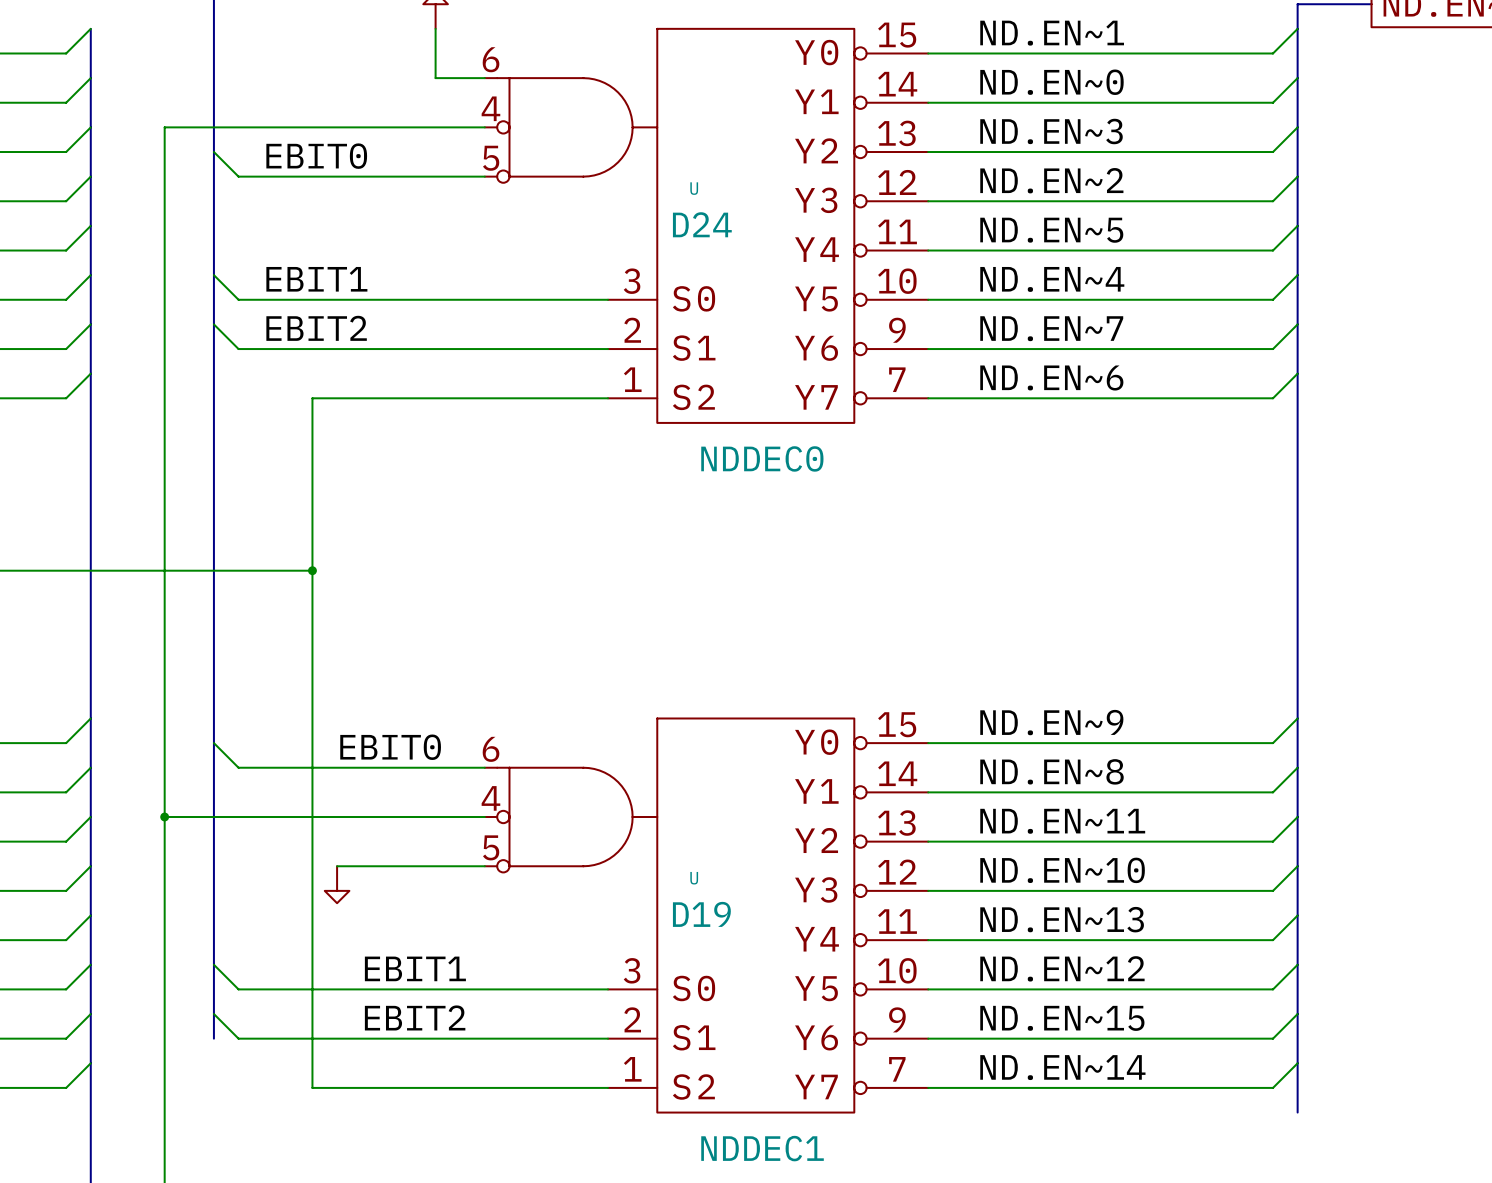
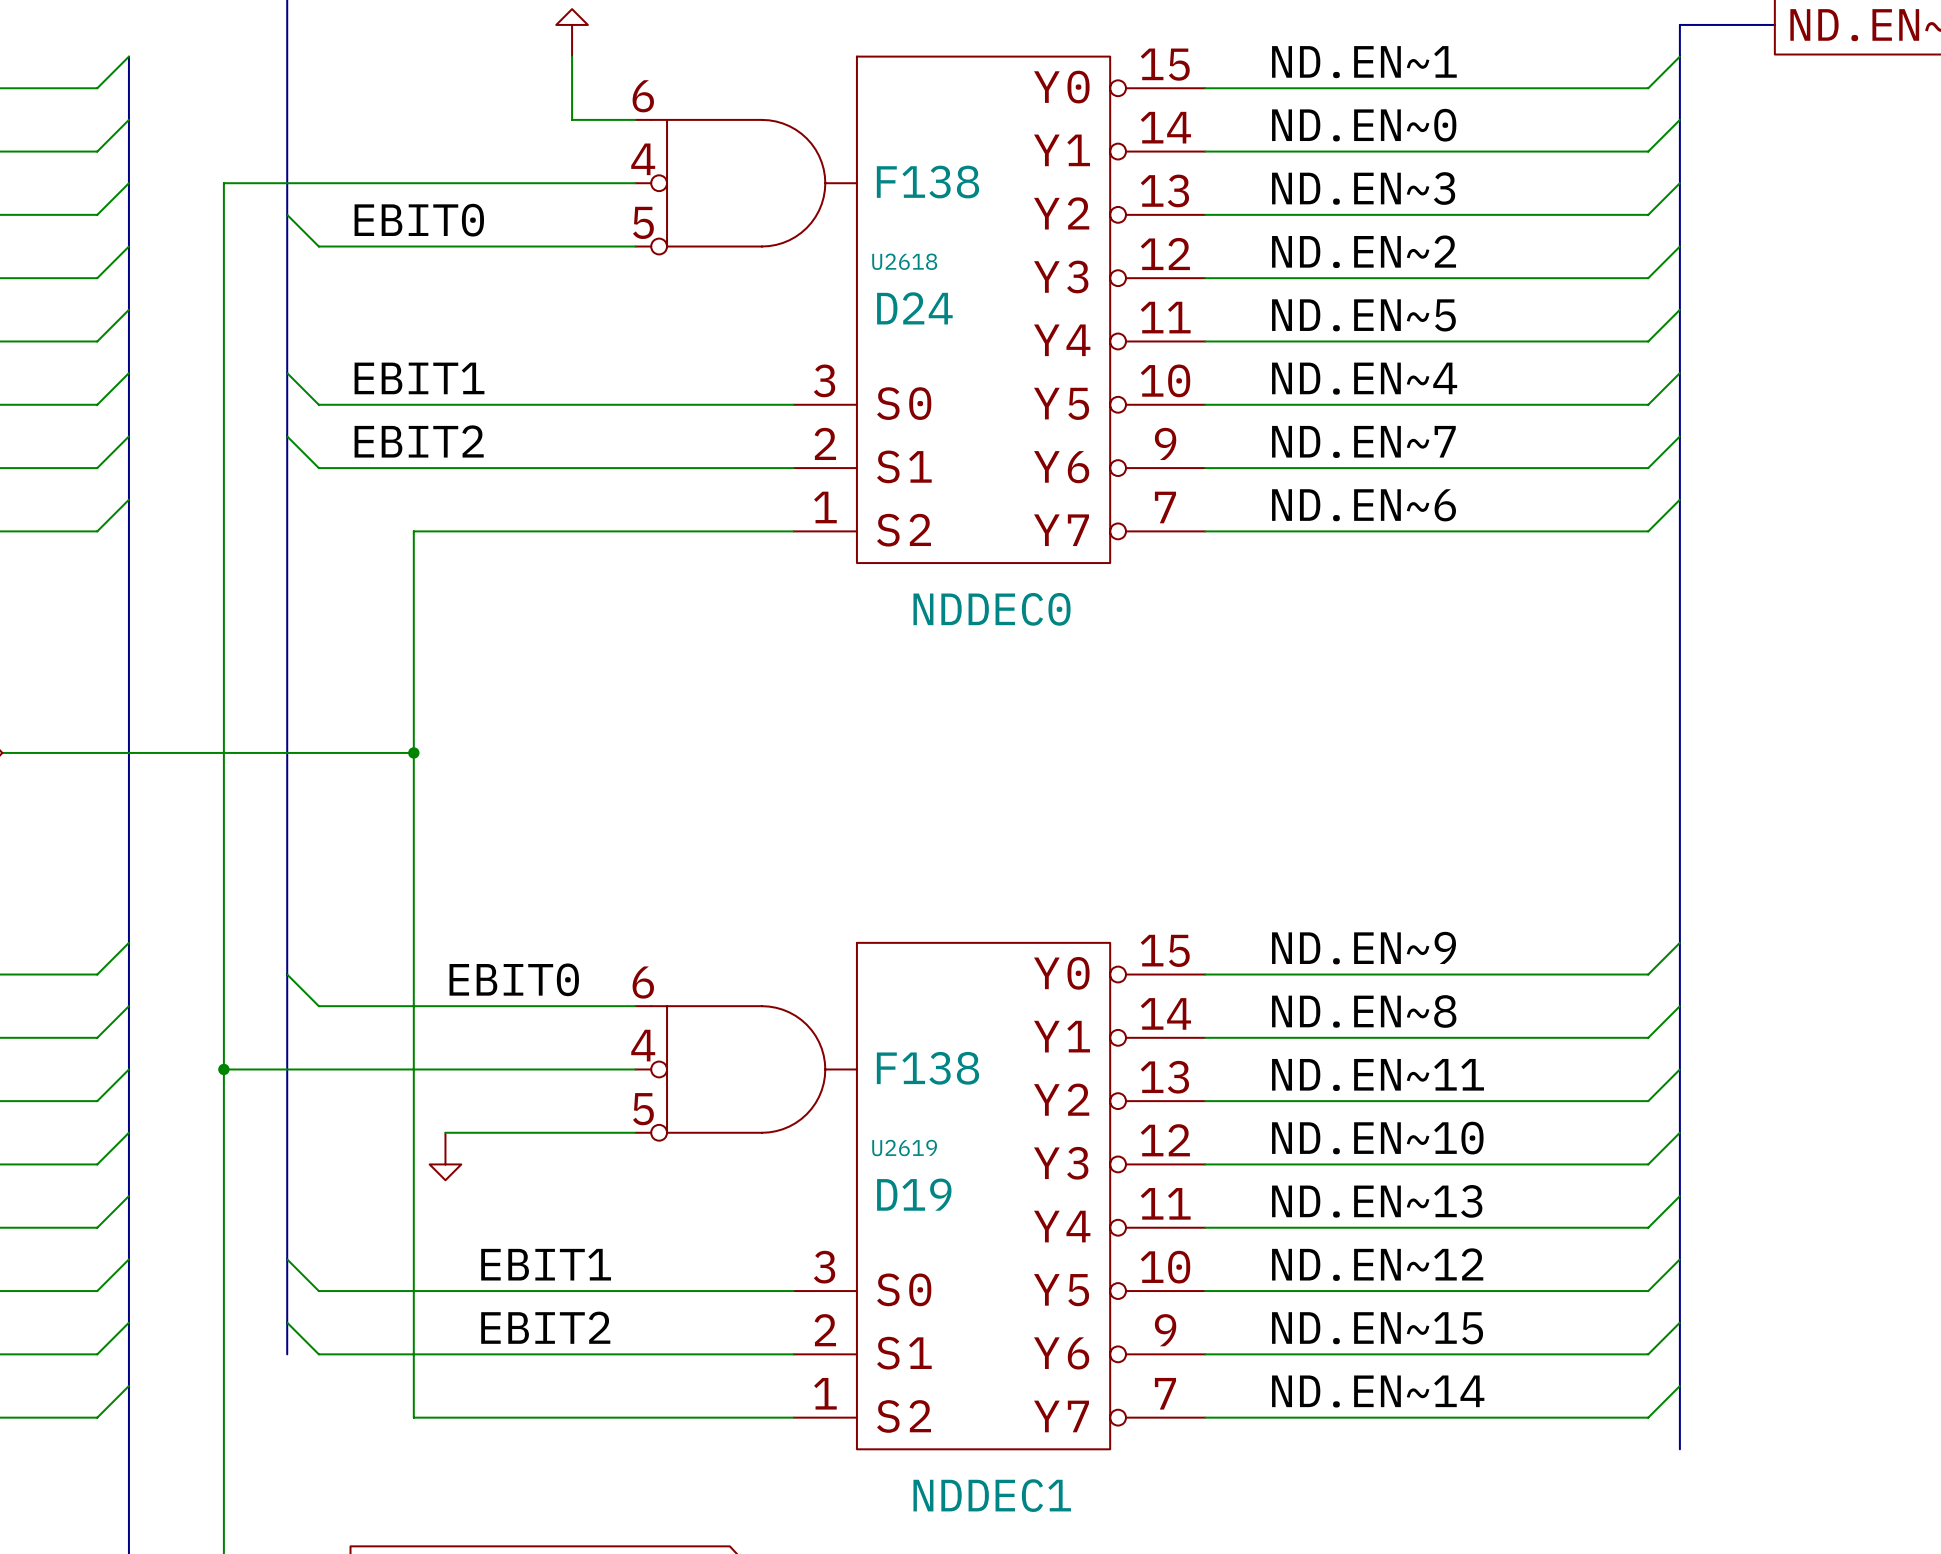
U value: none -> F138 (927, 182)
U name: U (694, 188) -> U2618 (904, 261)
U value: none -> F138 (927, 1068)
U name: U (694, 878) -> U2619 (904, 1148)

